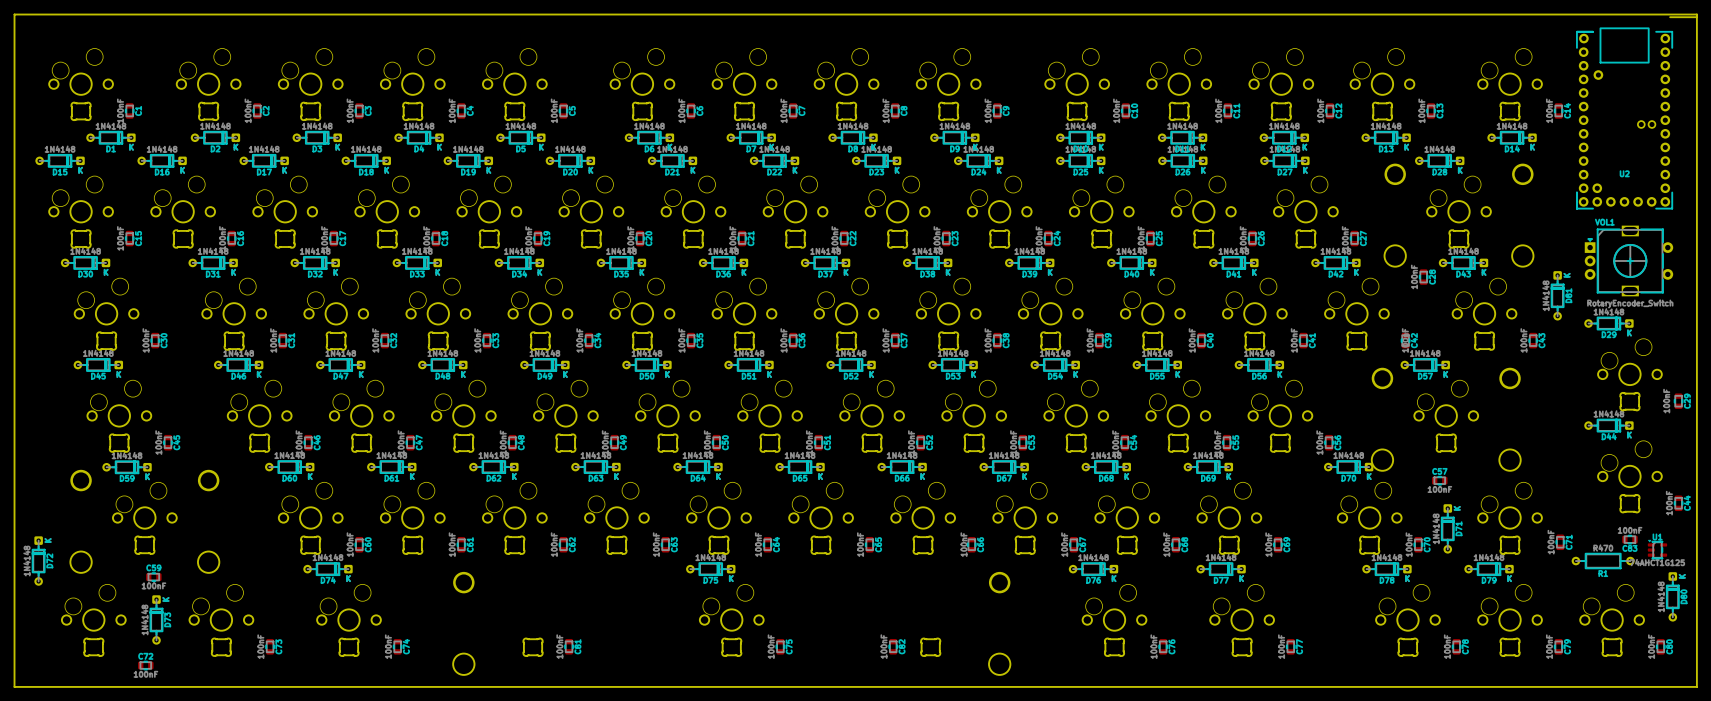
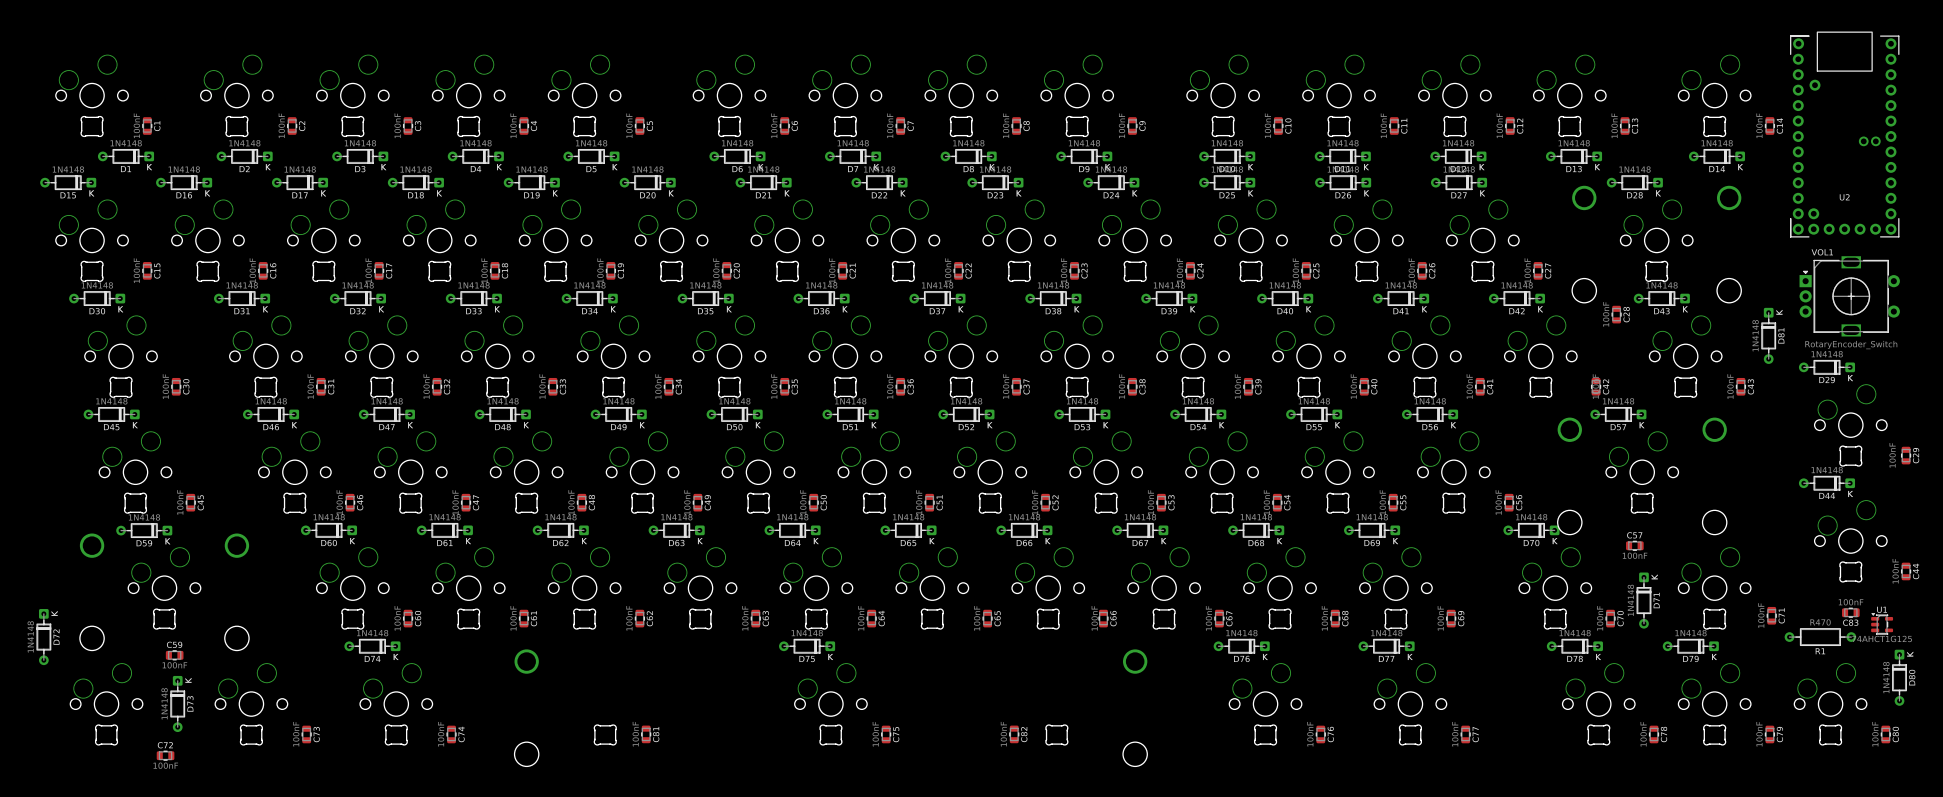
board edge: (14, 14) (1696, 14) (1696, 686) (14, 686) (14, 14) -> none
board edge: (1670, 17) (1696, 17) -> none

